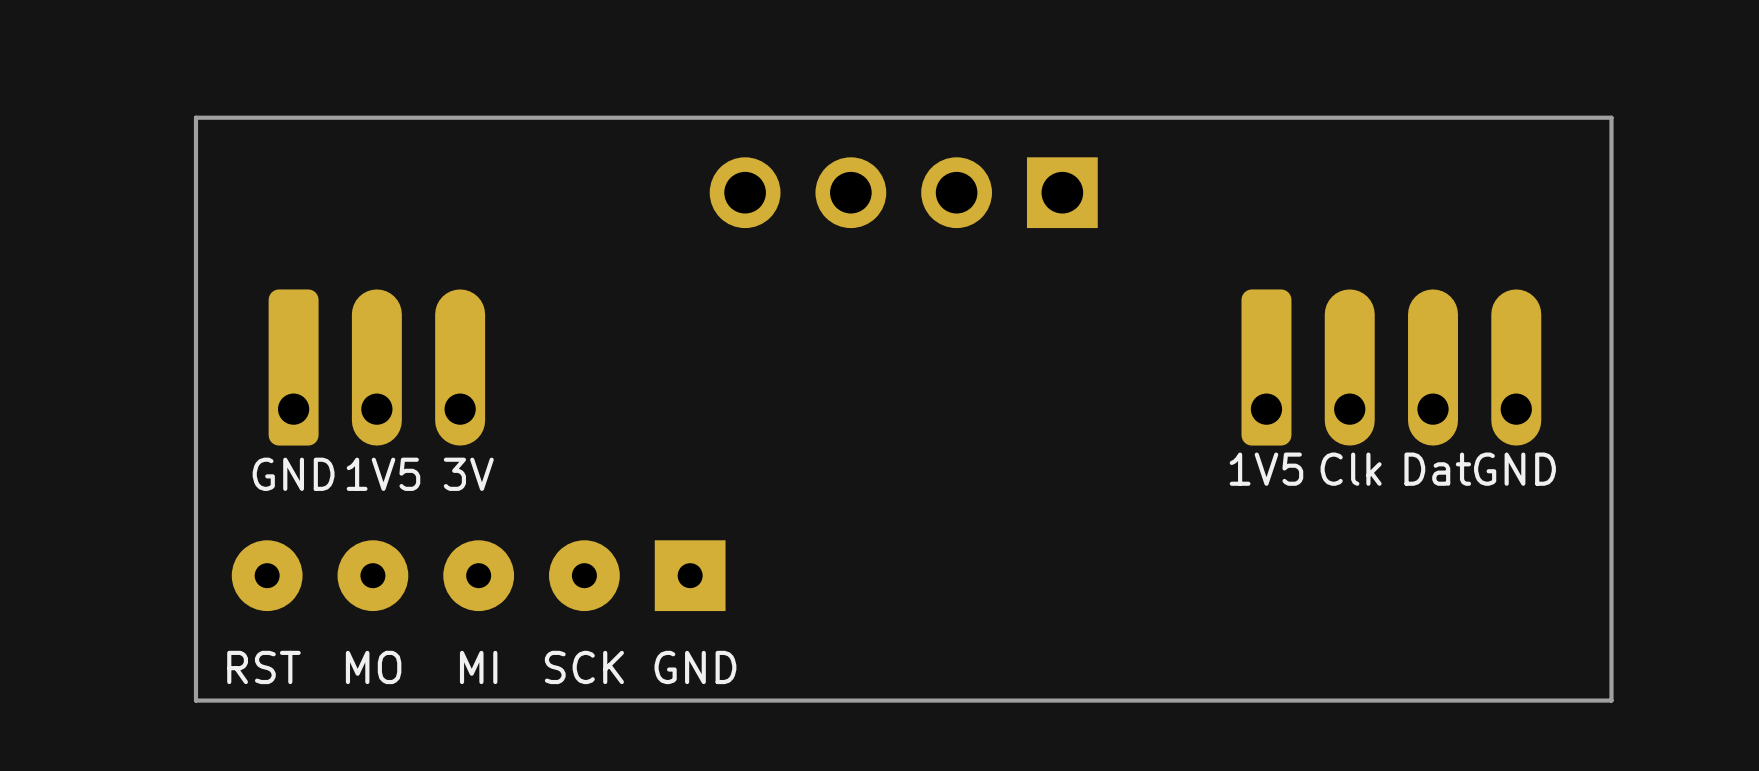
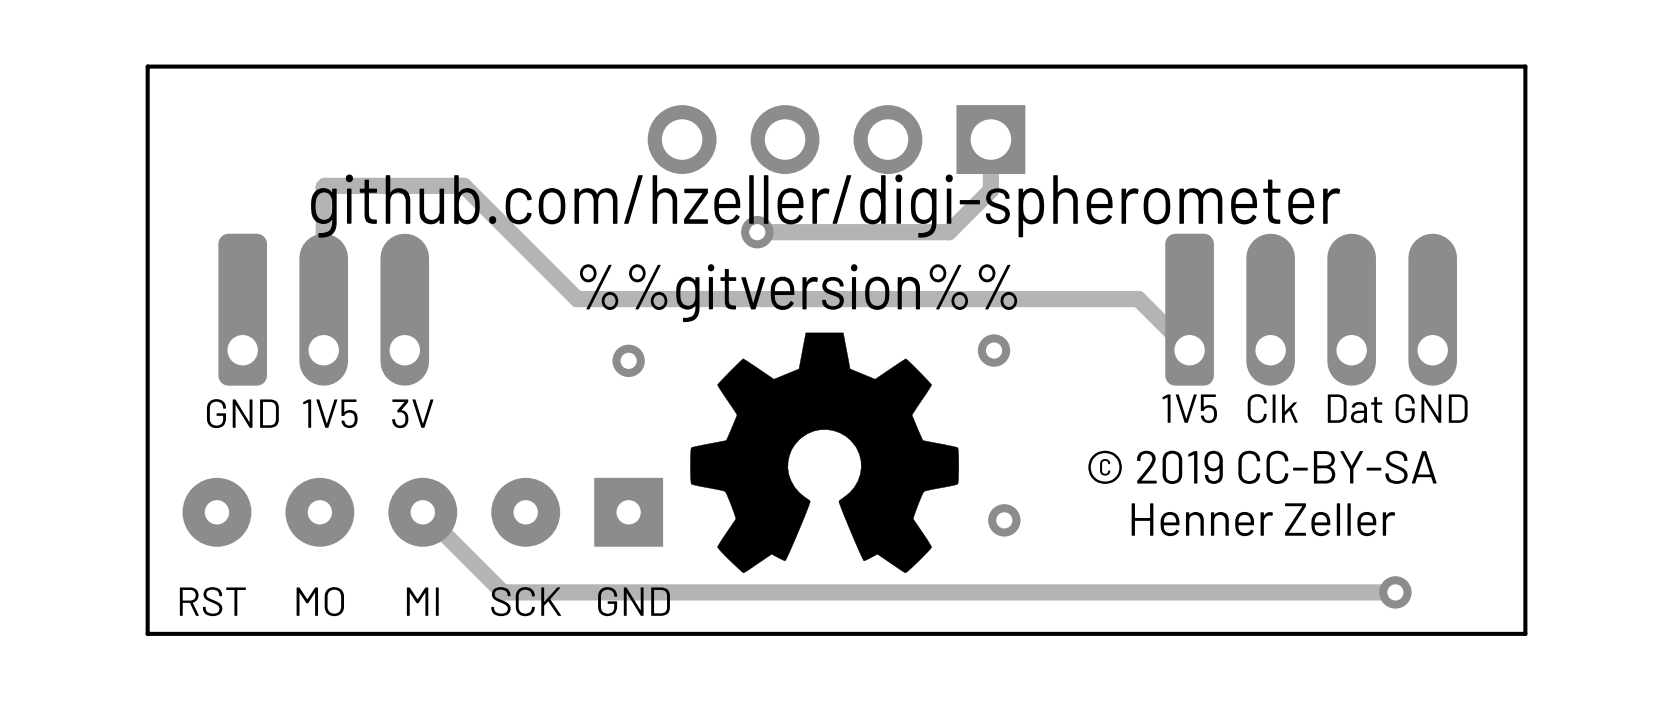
track: none -> (990, 139) (990, 190) (948, 232) (757, 232)
text: none -> github.com/hzeller/digi-spherometer (825, 206)
via: none -> (757, 232)
text: none -> %%gitversion%% (798, 293)
drawing: none -> [690, 332, 959, 574]
via: none -> (994, 350)
track: none -> (1189, 350) (1138, 299) (577, 299) (463, 185) (323, 187) (323, 350)
via: none -> (628, 360)
text: none -> © 2019 CC-BY-SA (1262, 467)
track: none -> (422, 512) (502, 592) (1395, 592)
via: none -> (1004, 520)
text: none -> Henner Zeller (1263, 519)
via: none -> (1395, 592)

